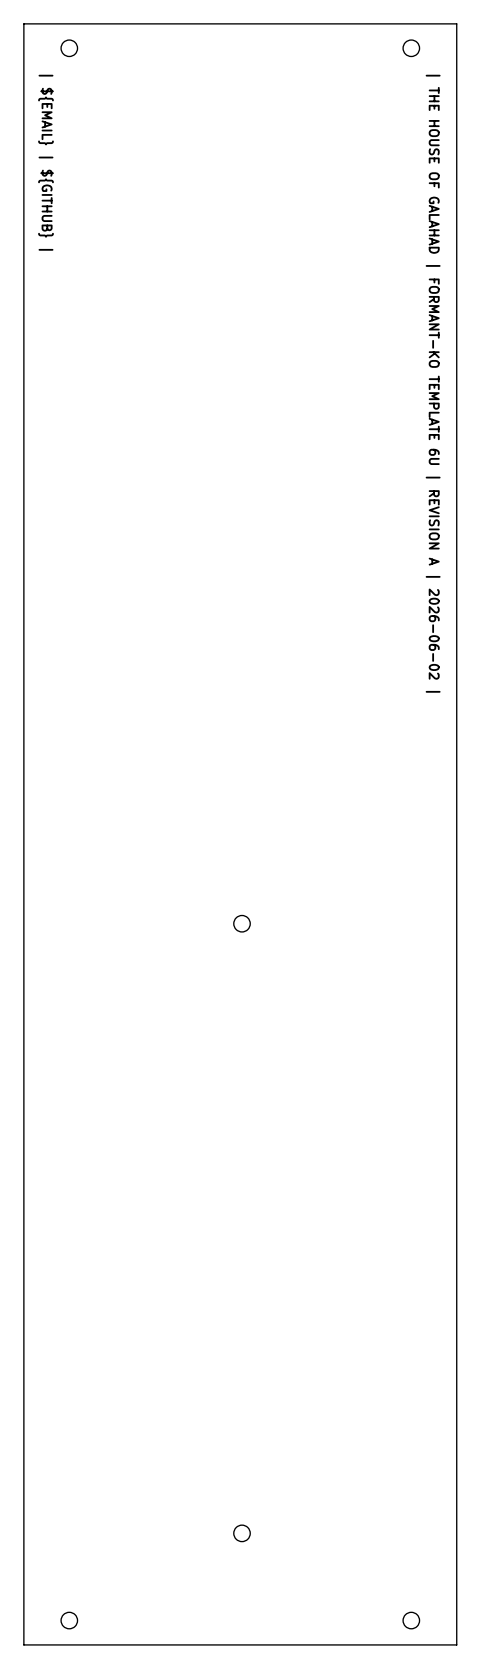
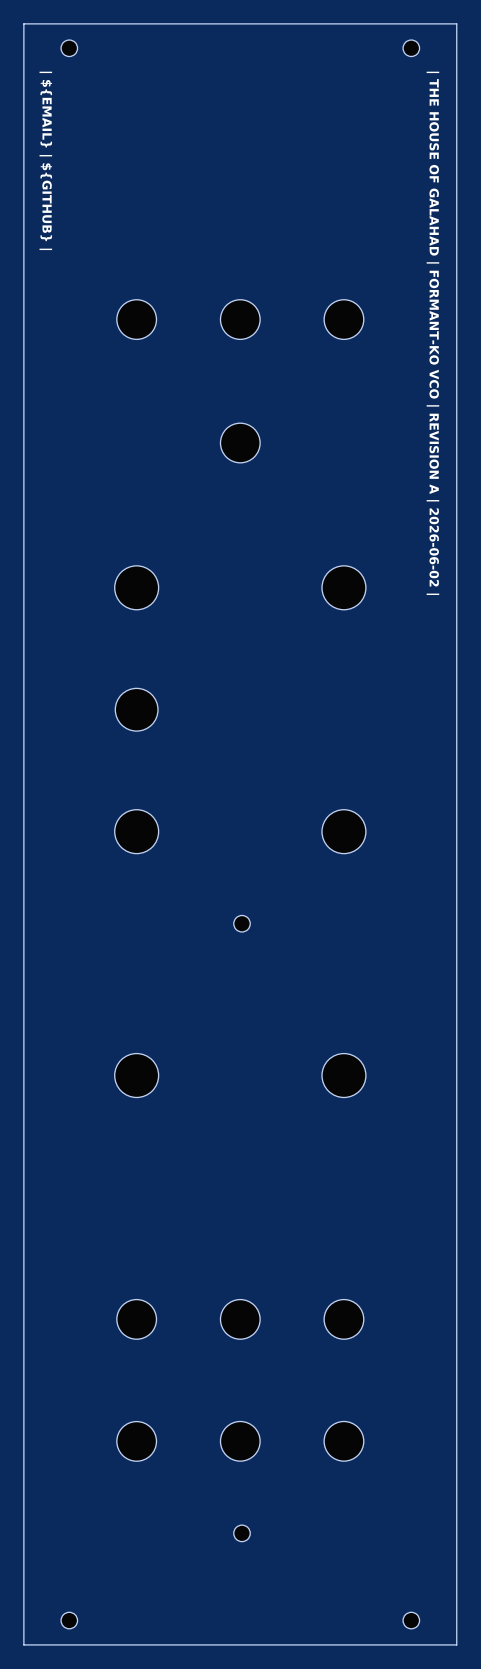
part: none -> (136, 319)
part: none -> (240, 319)
part: none -> (343, 319)
text: | THE HOUSE OF GALAHAD | FORMANT-KO TEMPLATE 6U | REVISION A | 2026-06-02 | (433, 383) -> | THE HOUSE OF GALAHAD | FORMANT-KO VCO | REVISION A | 2026-06-02 | (432, 333)
part: none -> (240, 443)
part: none -> (136, 587)
part: none -> (343, 587)
part: none -> (136, 709)
part: none -> (136, 831)
part: none -> (343, 831)
part: none -> (136, 1075)
part: none -> (343, 1075)
part: none -> (136, 1319)
part: none -> (240, 1319)
part: none -> (343, 1319)
part: none -> (136, 1441)
part: none -> (240, 1441)
part: none -> (343, 1441)

